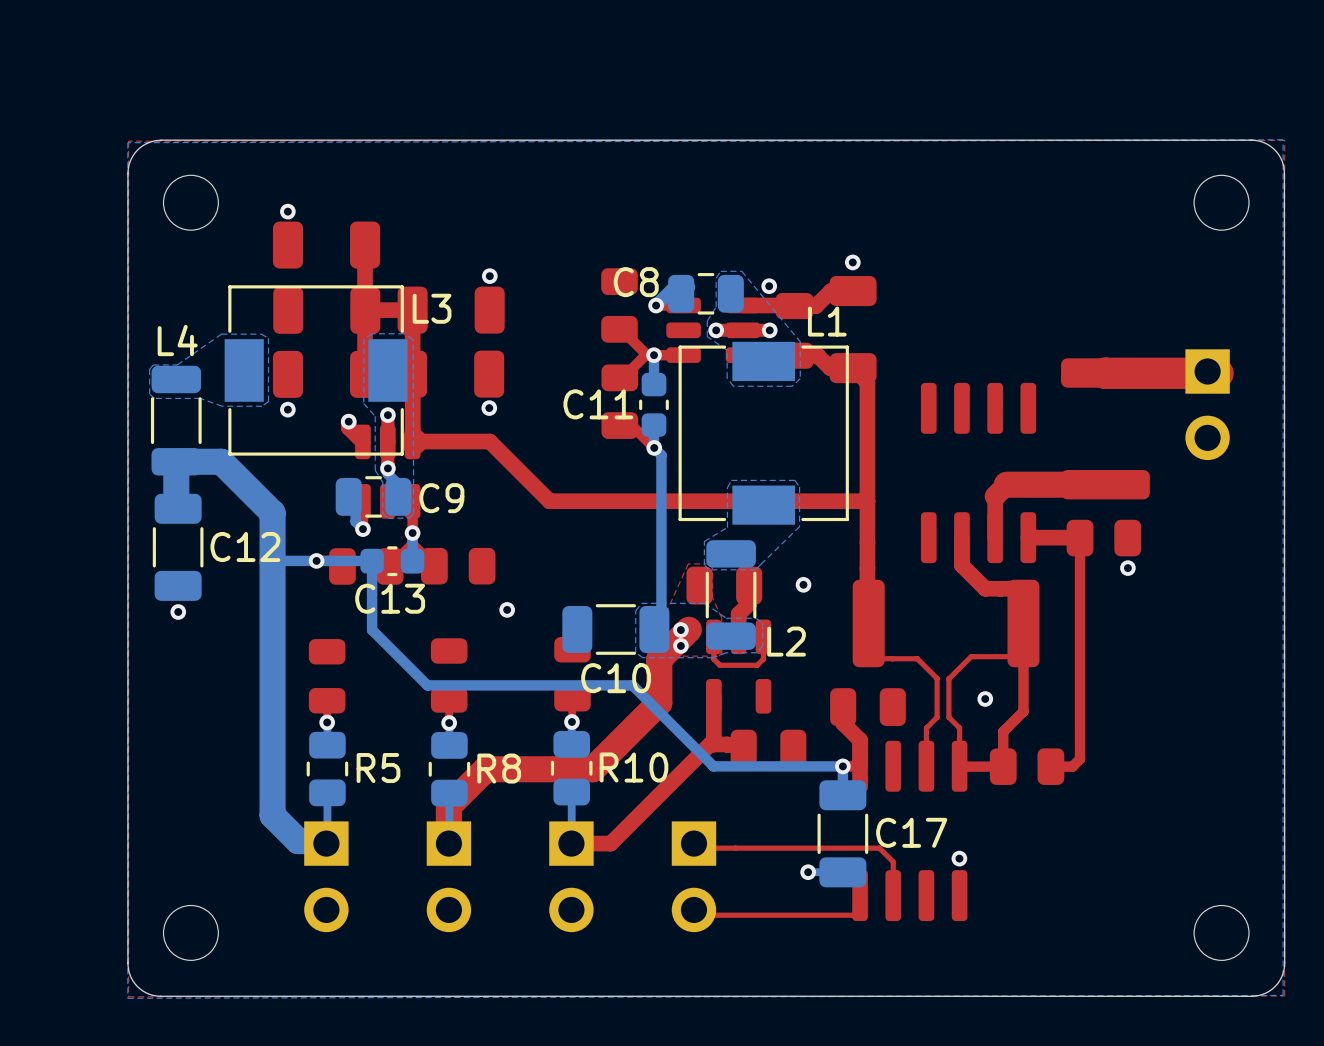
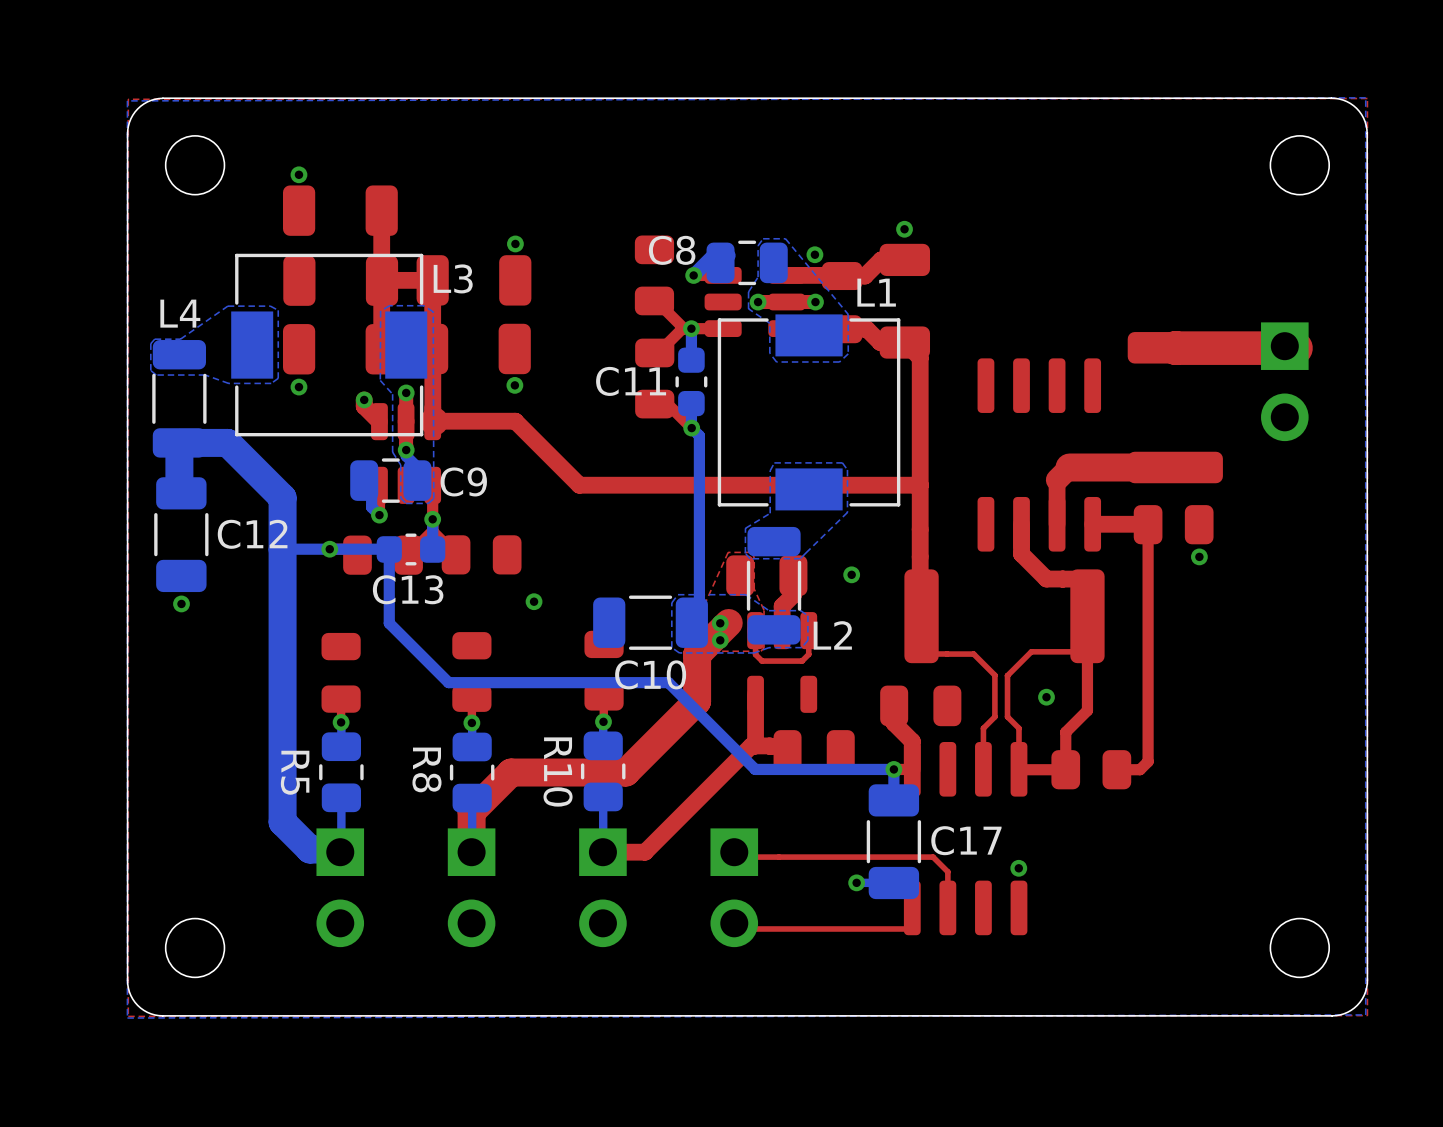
R10 name rotation: 0° (633, 767) -> 90° clockwise (558, 772)
R10 name position: R10 (633, 767) -> R10 (558, 772)
R5 name rotation: 0° (378, 768) -> 90° clockwise (295, 772)
R5 name position: R5 (378, 768) -> R5 (295, 772)
R8 name rotation: 0° (499, 768) -> 90° clockwise (426, 769)
R8 name position: R8 (499, 768) -> R8 (426, 769)

